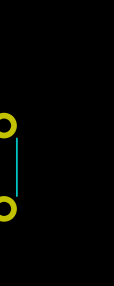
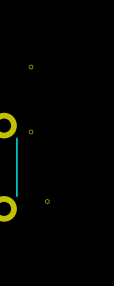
part: none -> (31, 66)
part: none -> (31, 132)
part: none -> (47, 201)

